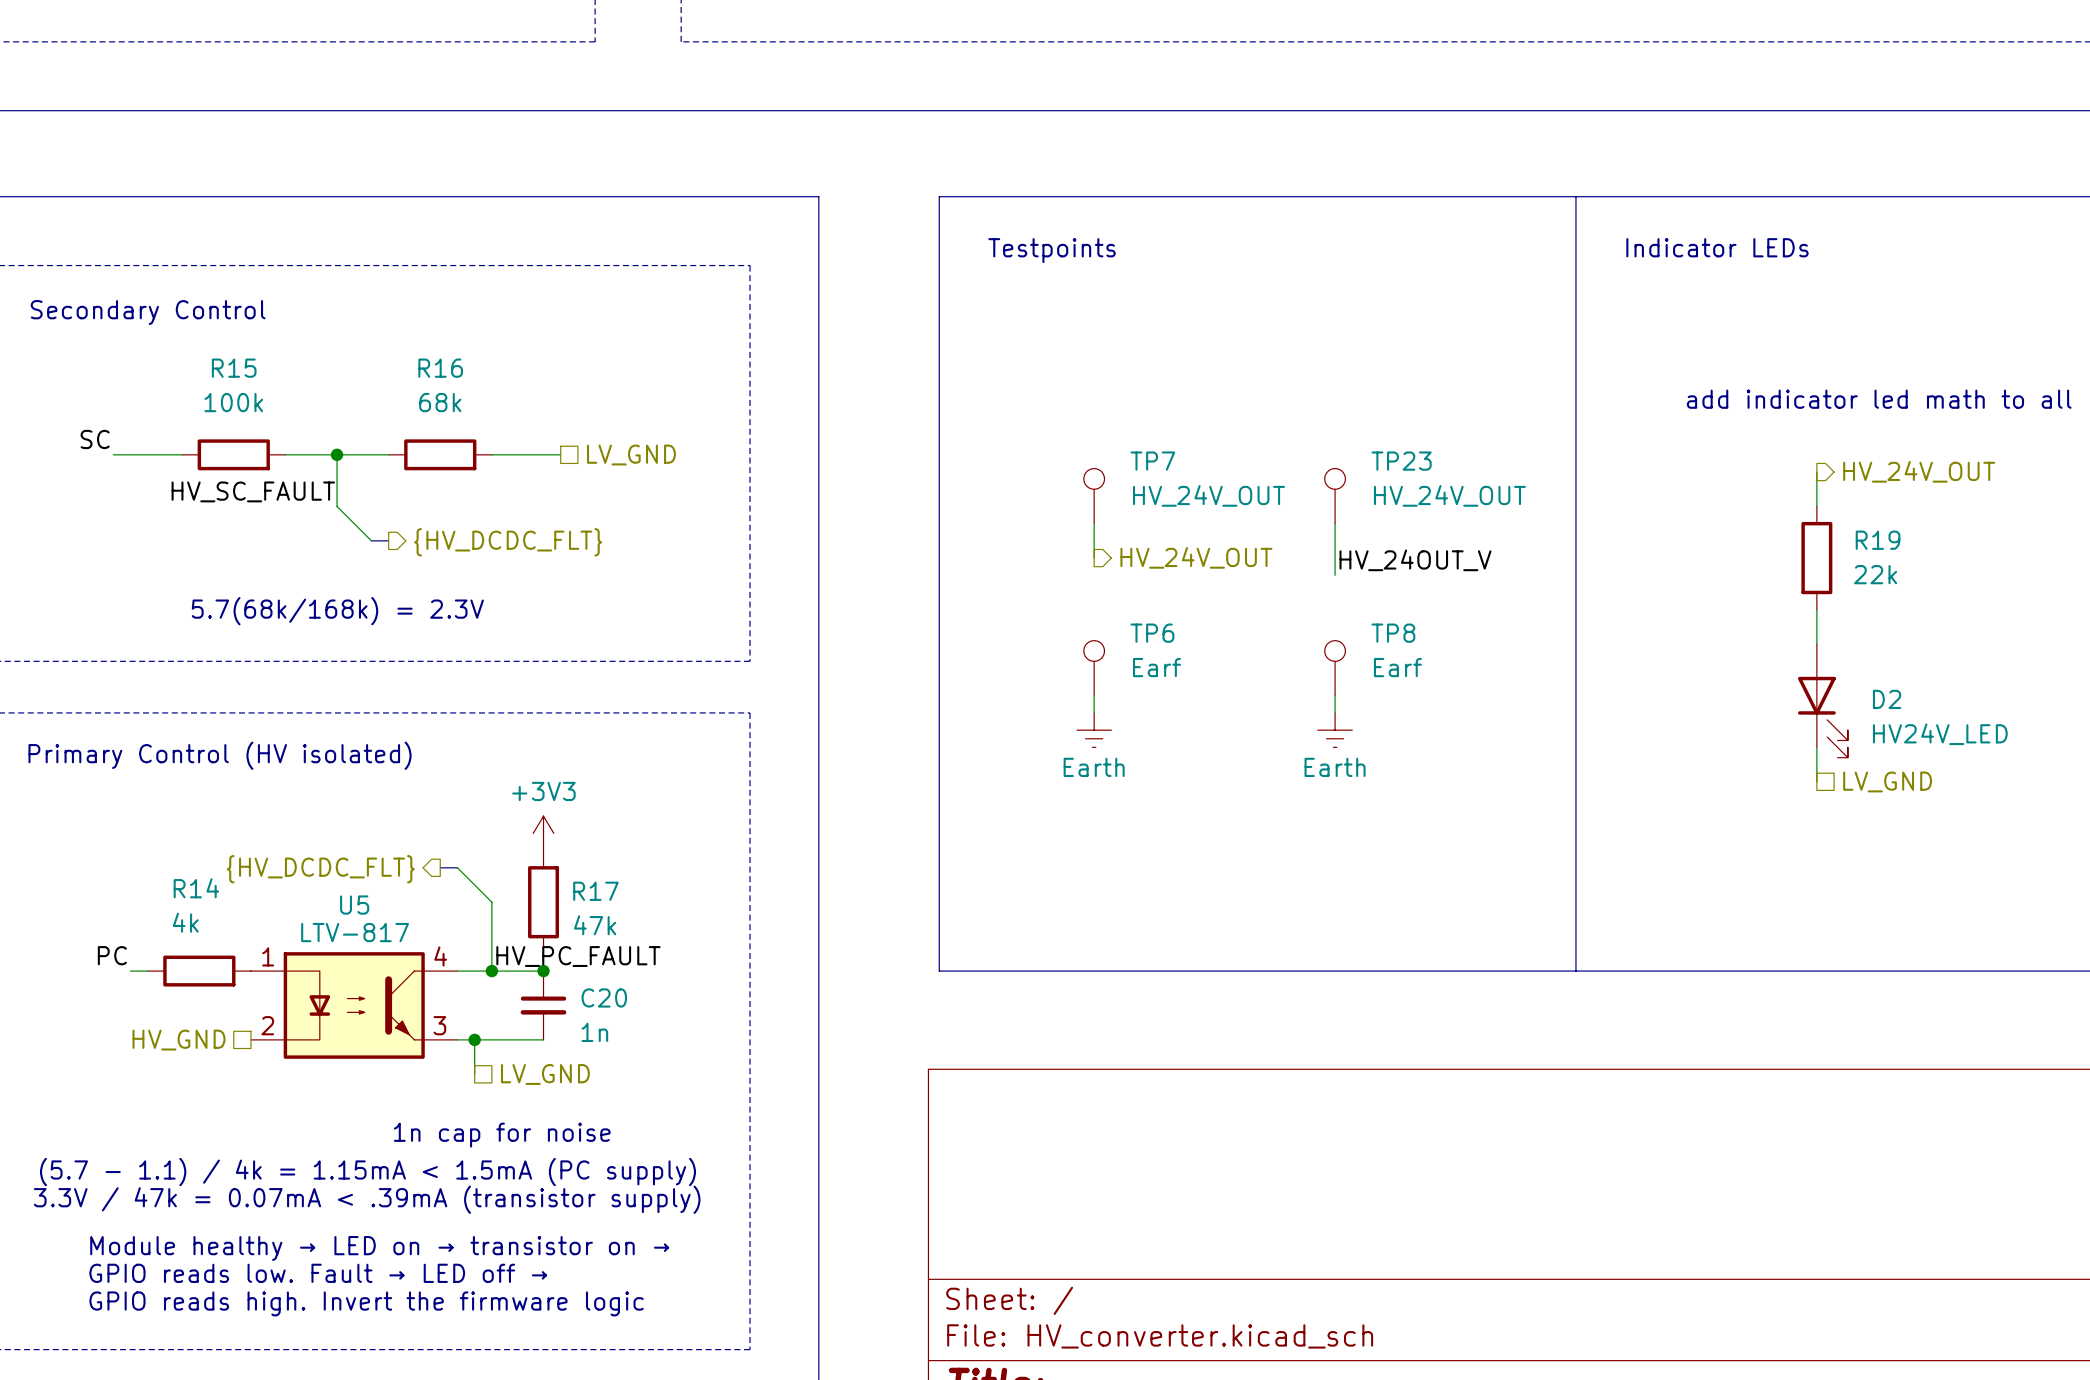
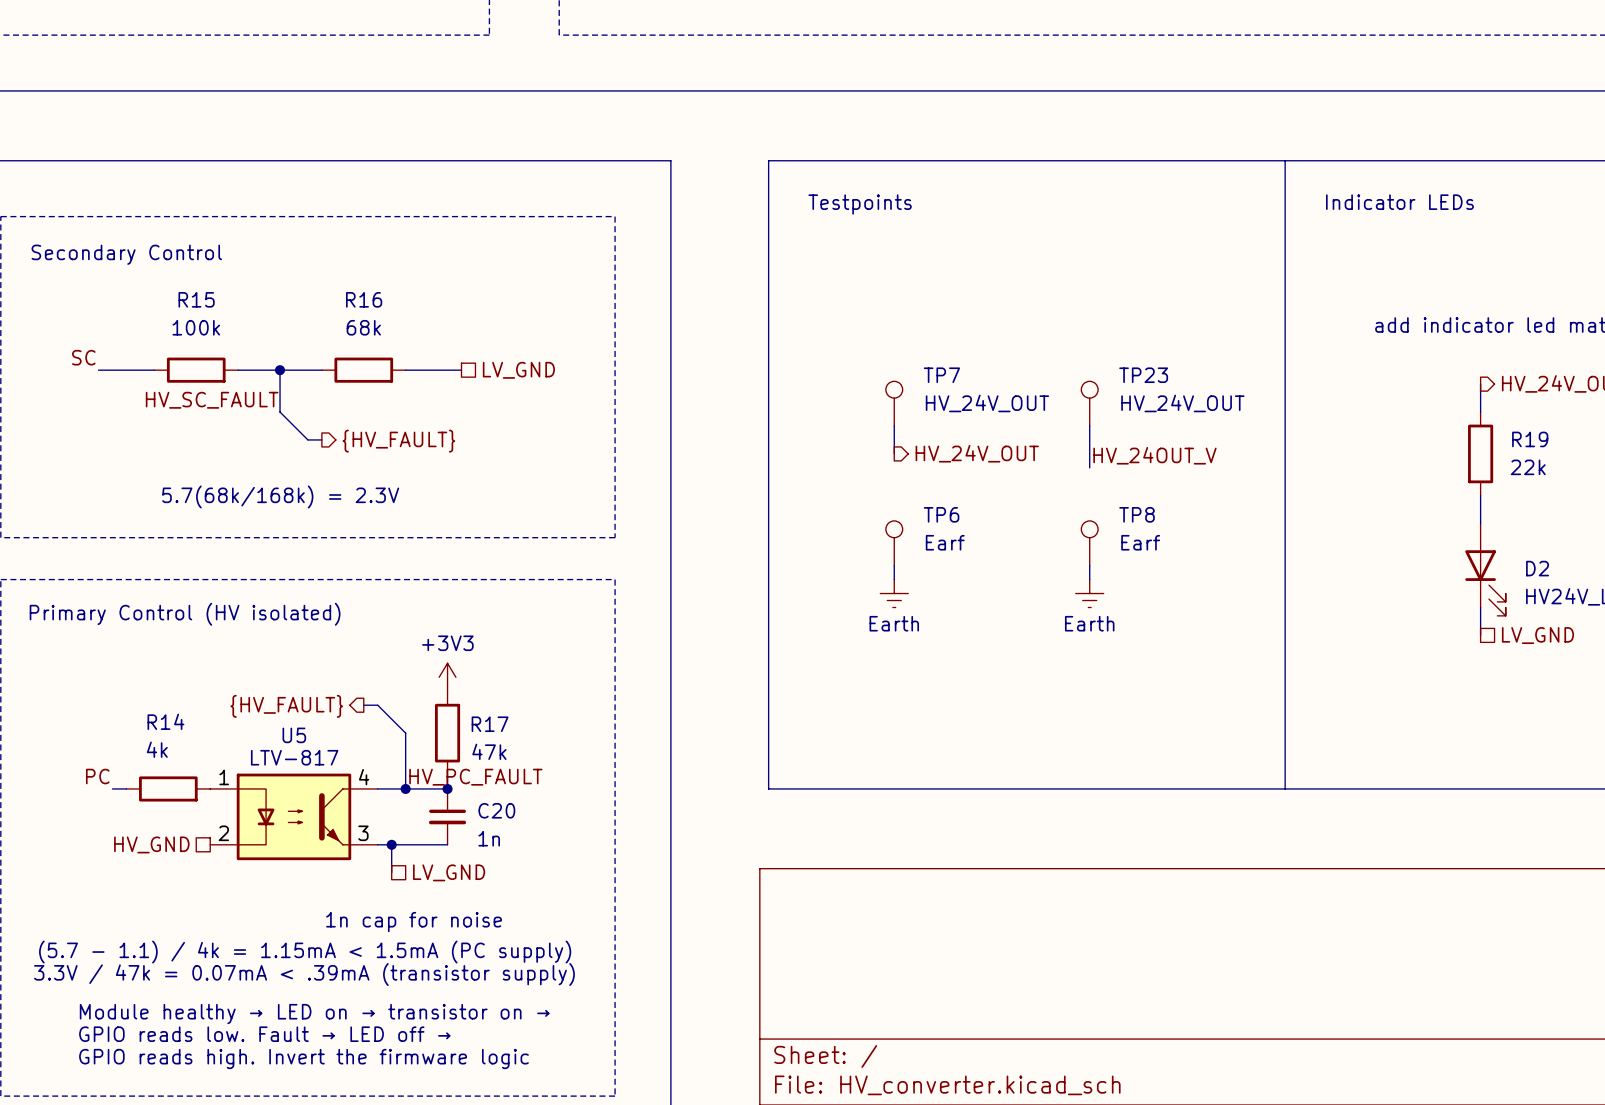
hierarchical label: {HV_DCDC_FLT} (508, 542) -> {HV_FAULT} (398, 441)
hierarchical label: {HV_DCDC_FLT} (320, 869) -> {HV_FAULT} (286, 706)

